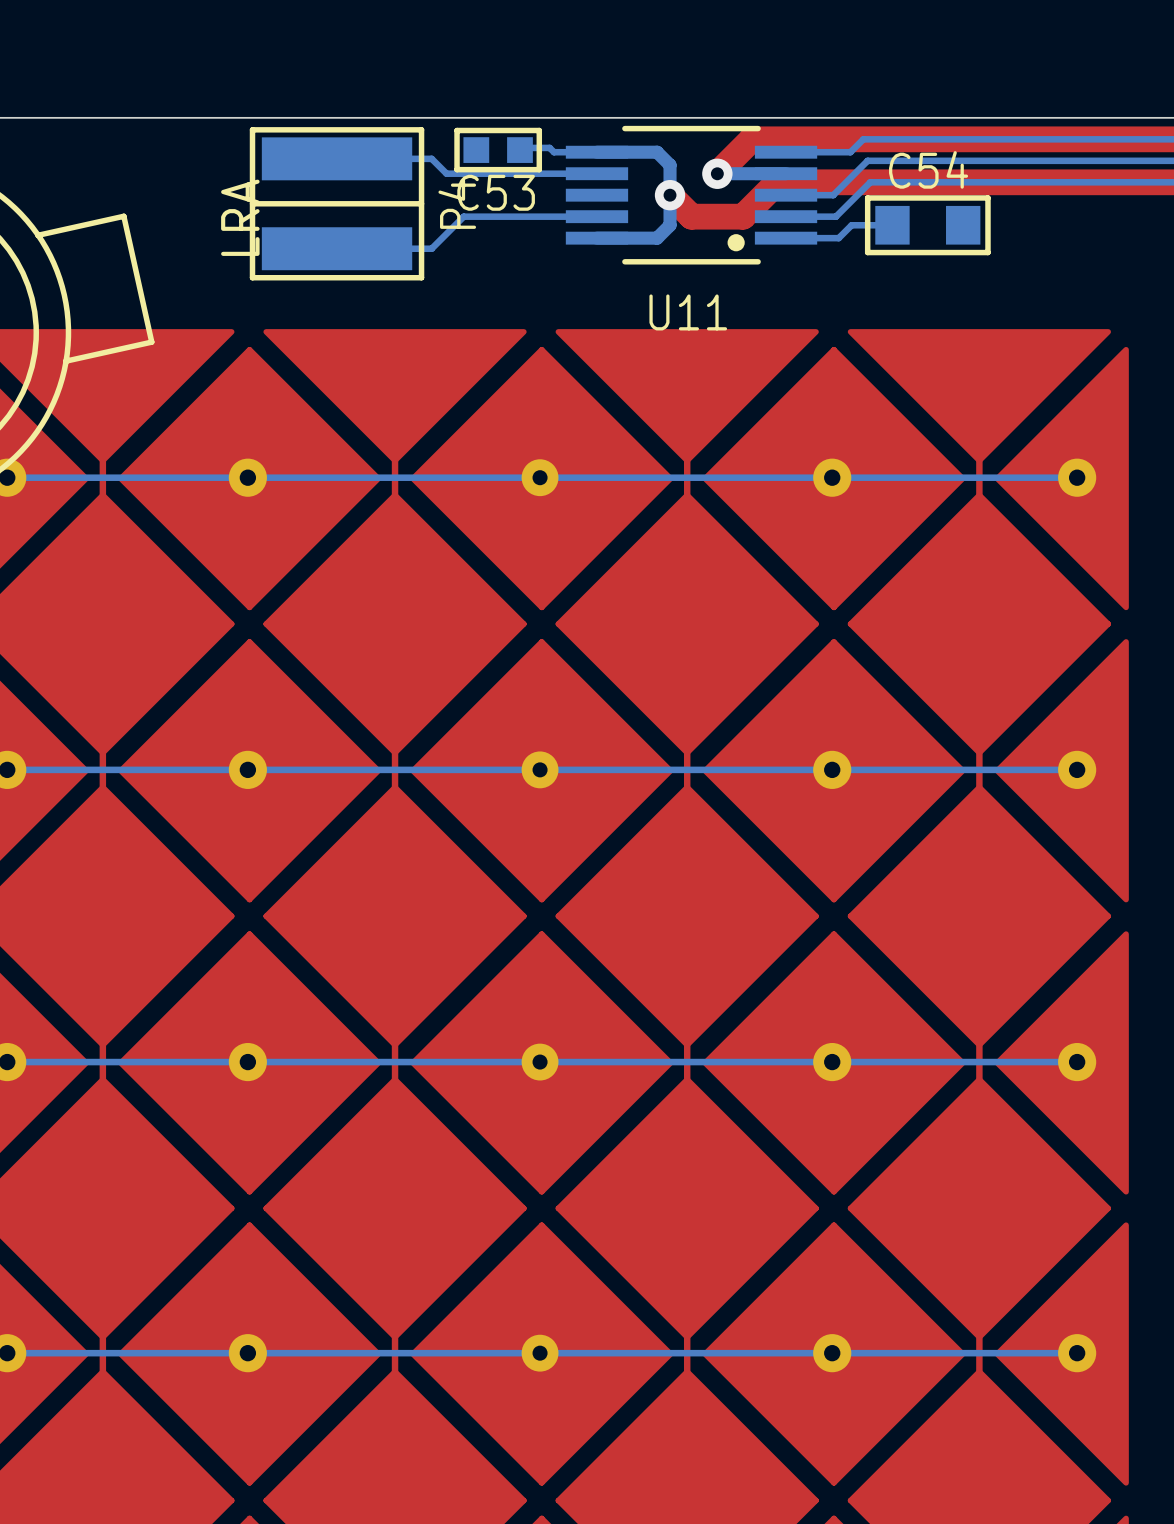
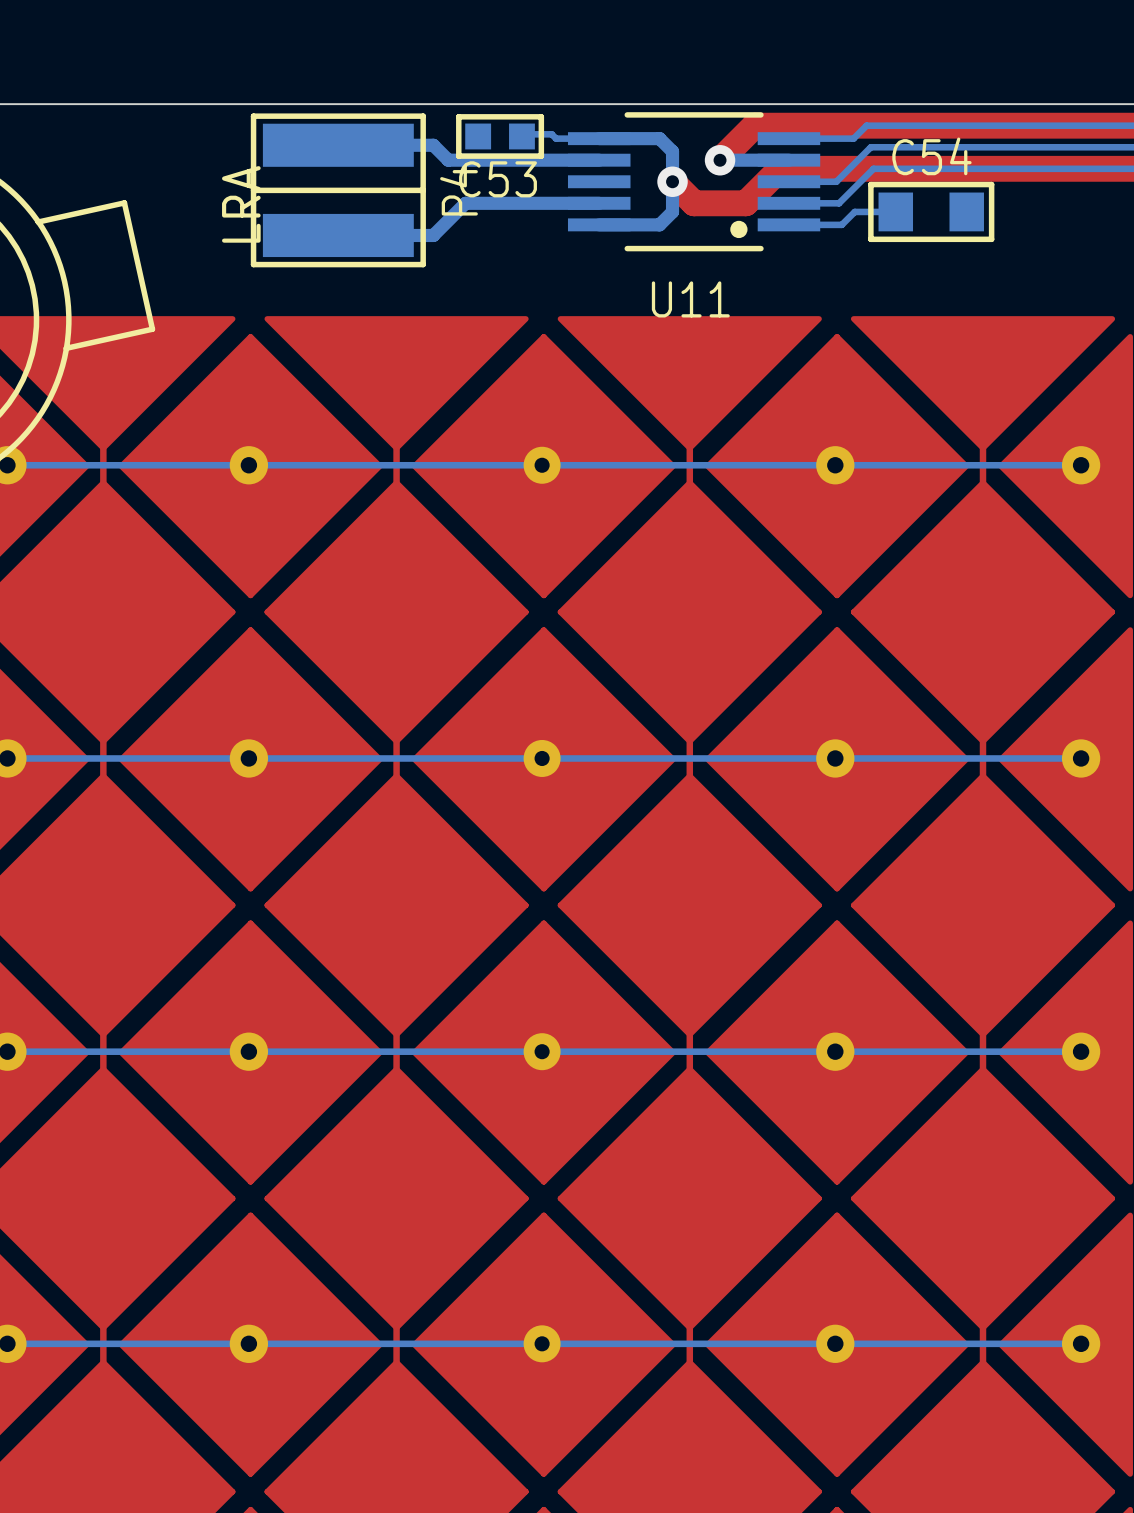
bottom track width: thin (337, 158) (431, 158) (446, 173) (596, 173) -> thick (338, 145) (433, 145) (448, 160) (599, 160)
bottom track width: thin (596, 216) (463, 216) (431, 248) (337, 248) -> thick (599, 203) (465, 203) (433, 235) (338, 235)

